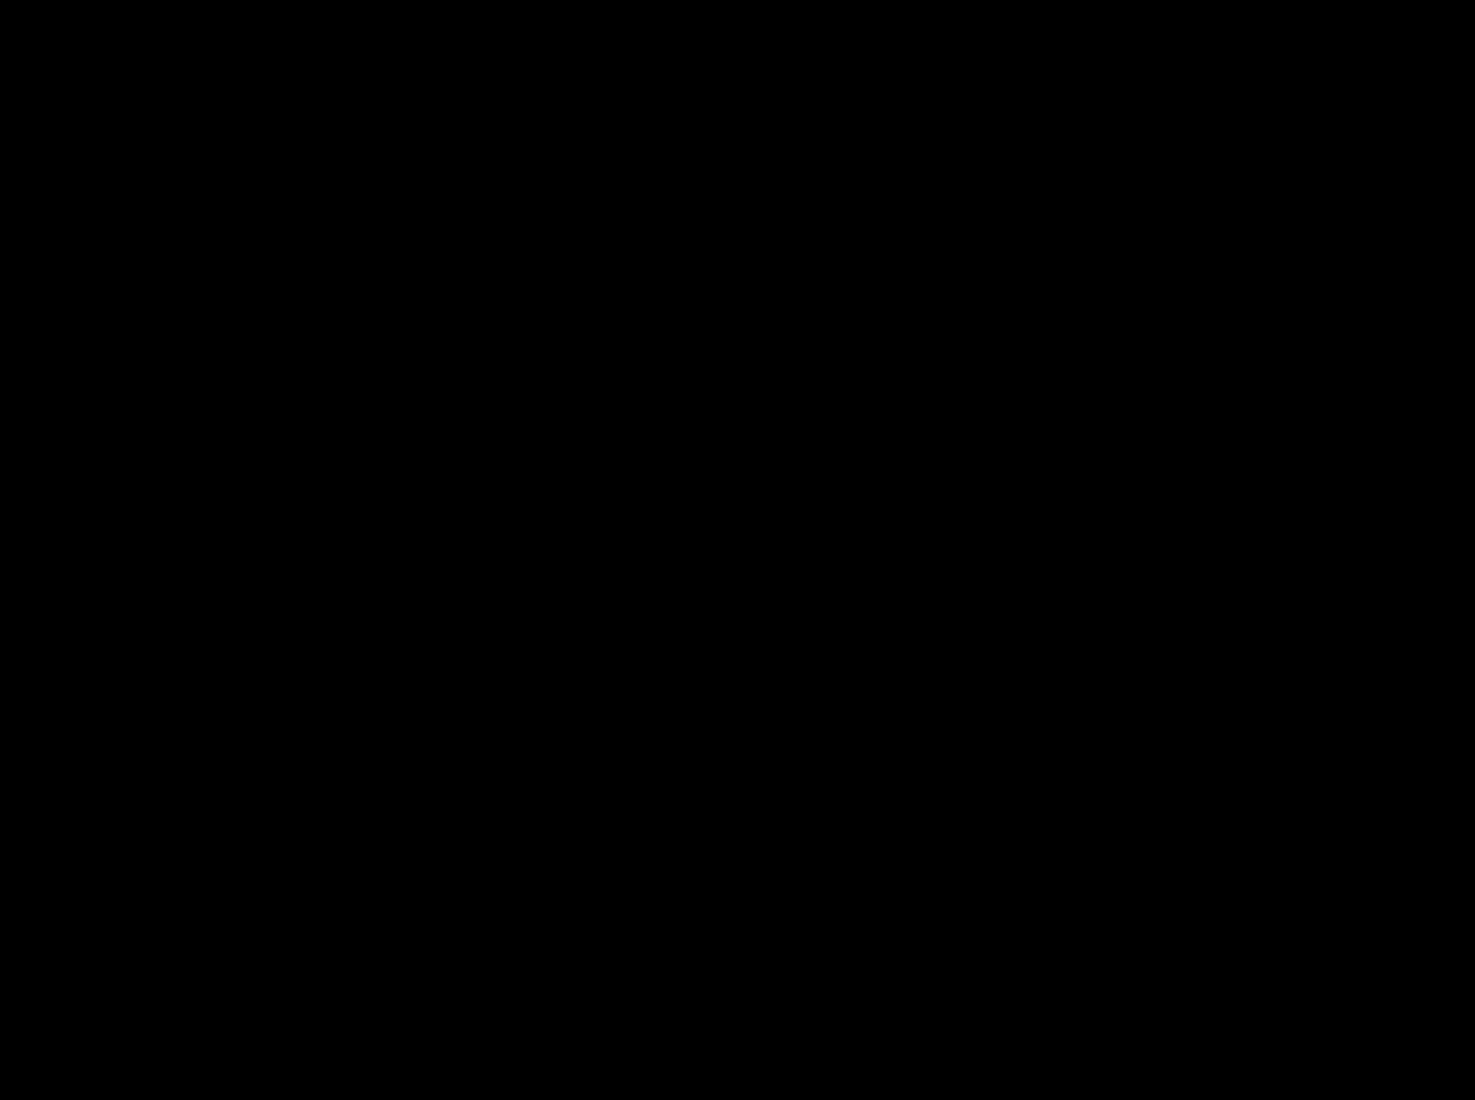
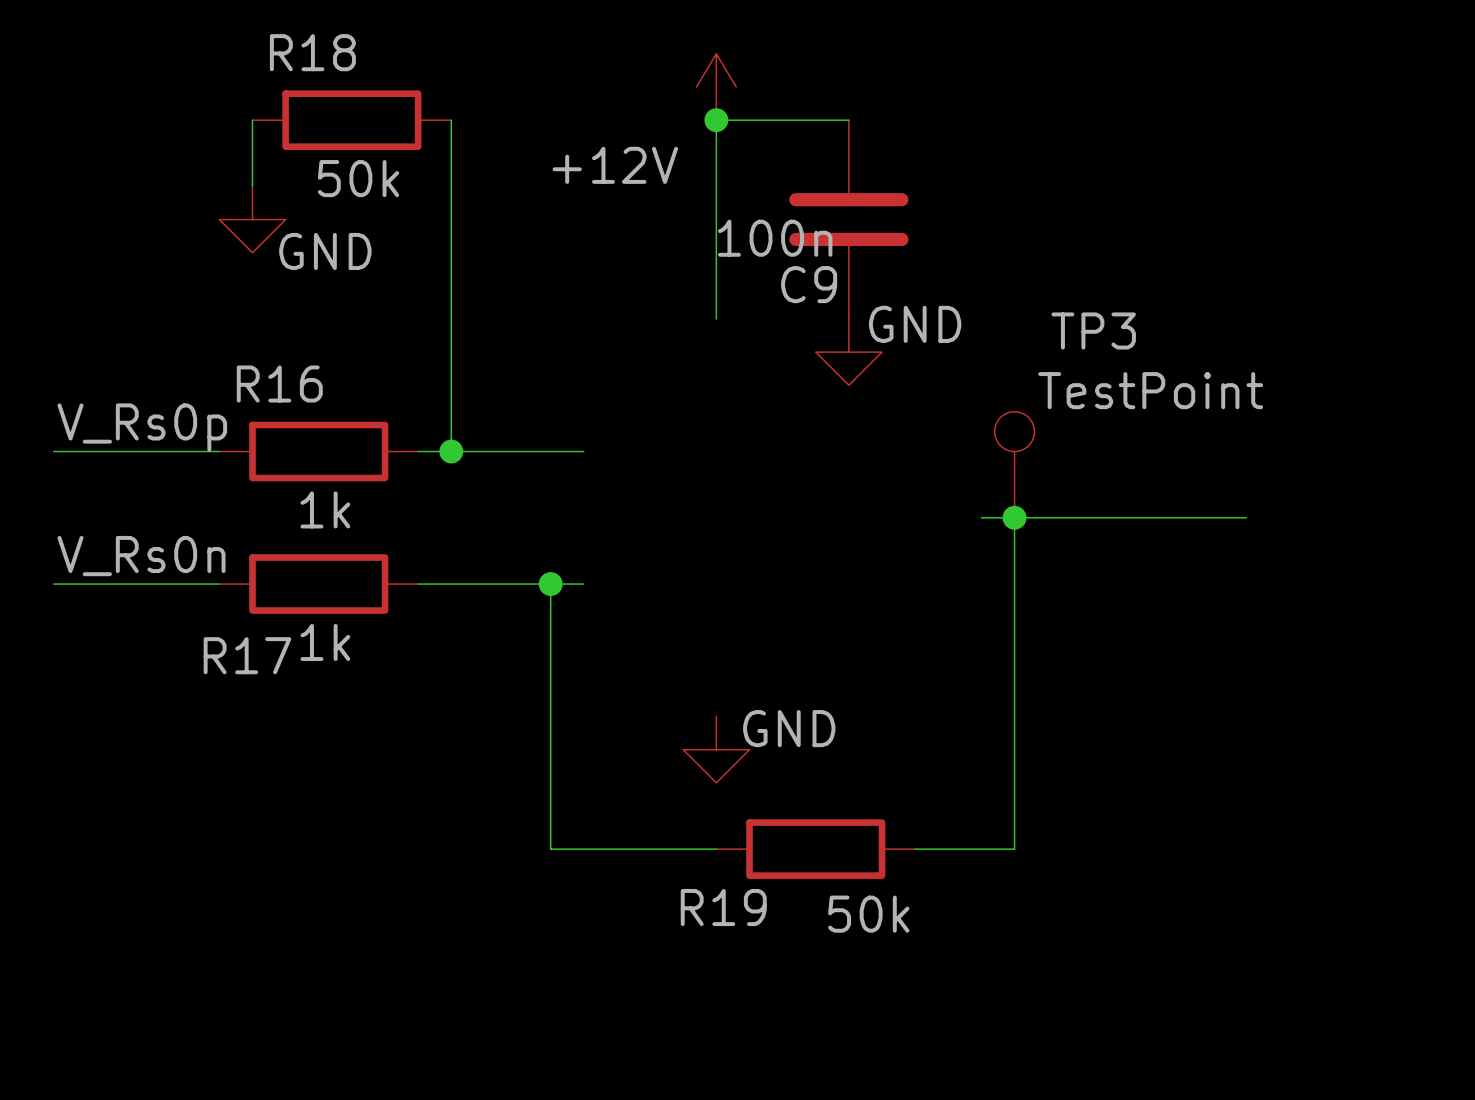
power symbol: none -> +12V (716, 87)
wire: none -> (252, 120) (252, 186)
R18: none -> 50k (351, 120)
wire: none -> (451, 120) (451, 451)
junction: none -> (716, 120)
wire: none -> (848, 120) (716, 120) (716, 318)
power symbol: none -> GND (252, 219)
C9: none -> 100n (848, 219)
power symbol: none -> GND (848, 352)
label: none -> V_Rs0p (142, 427)
wire: none -> (53, 451) (219, 451)
R16: none -> 1k (318, 451)
wire: none -> (418, 451) (583, 451)
junction: none -> (451, 451)
TP3: none -> TestPoint (1014, 464)
wire: none -> (981, 517) (1246, 517)
wire: none -> (1014, 517) (1014, 849) (915, 849)
junction: none -> (1014, 517)
label: none -> V_Rs0n (141, 556)
wire: none -> (53, 584) (219, 584)
R17: none -> 1k (318, 584)
wire: none -> (418, 584) (583, 584)
wire: none -> (550, 584) (550, 849) (716, 849)
junction: none -> (550, 584)
power symbol: none -> GND (716, 749)
R19: none -> 50k (815, 849)

